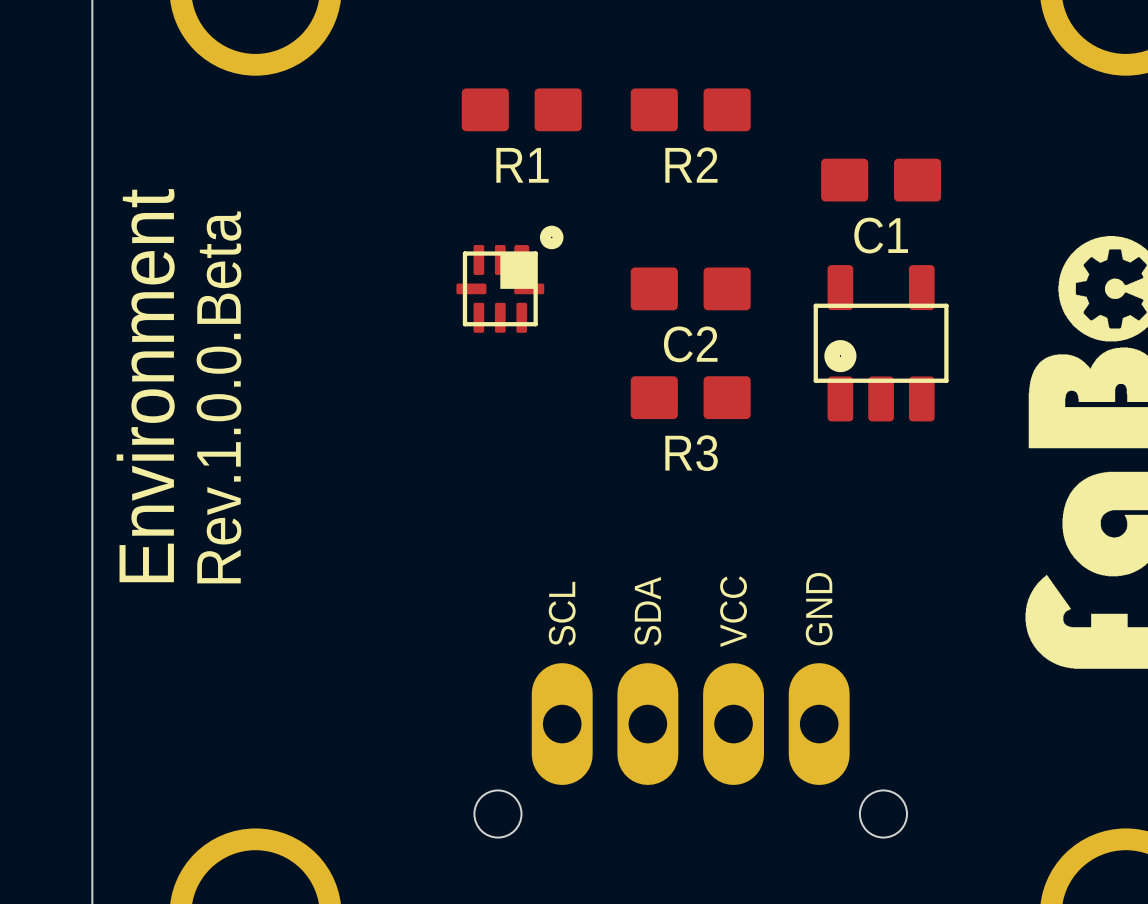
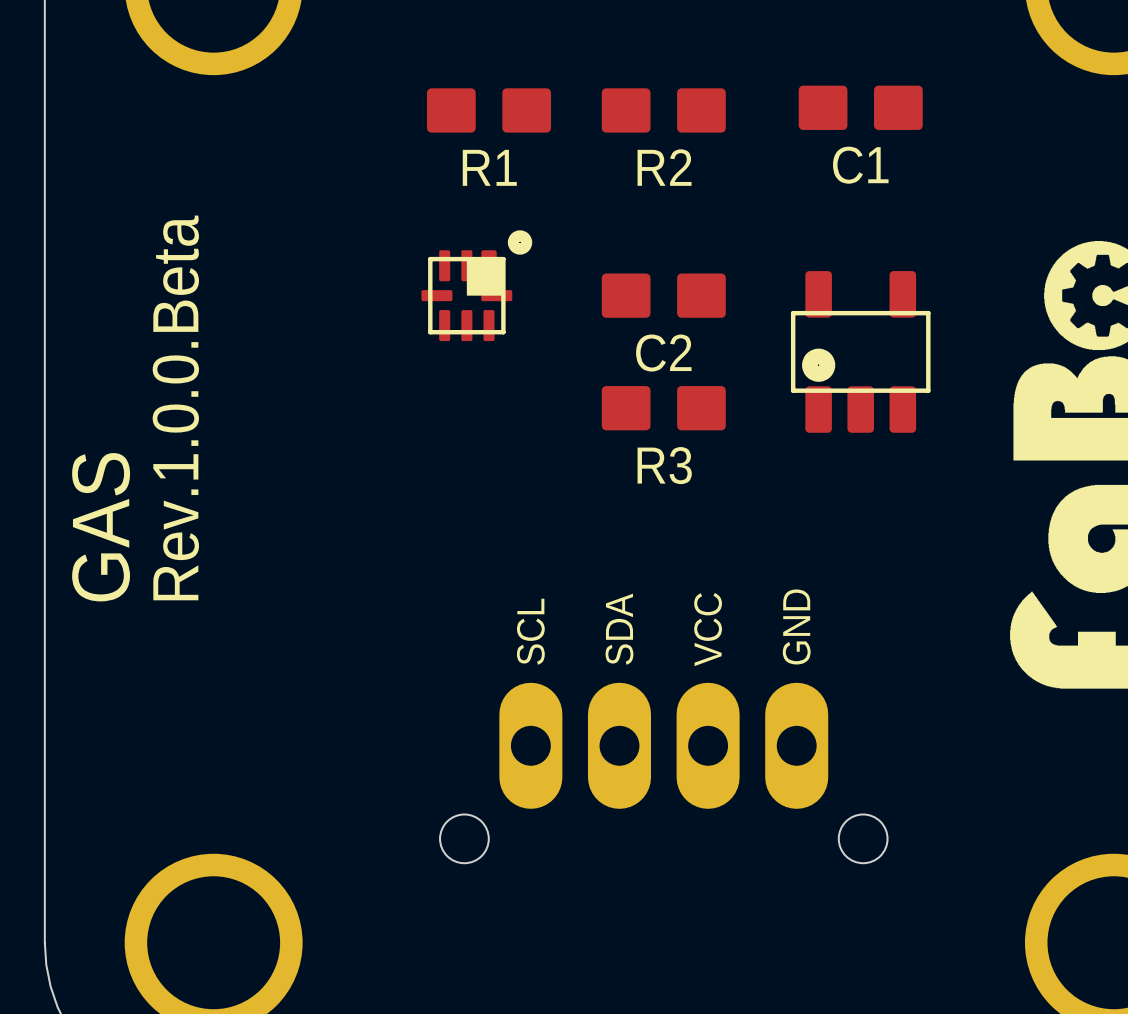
C1 position: (881, 180) -> (860, 107)
text: Environment (145, 385) -> GAS (101, 527)

